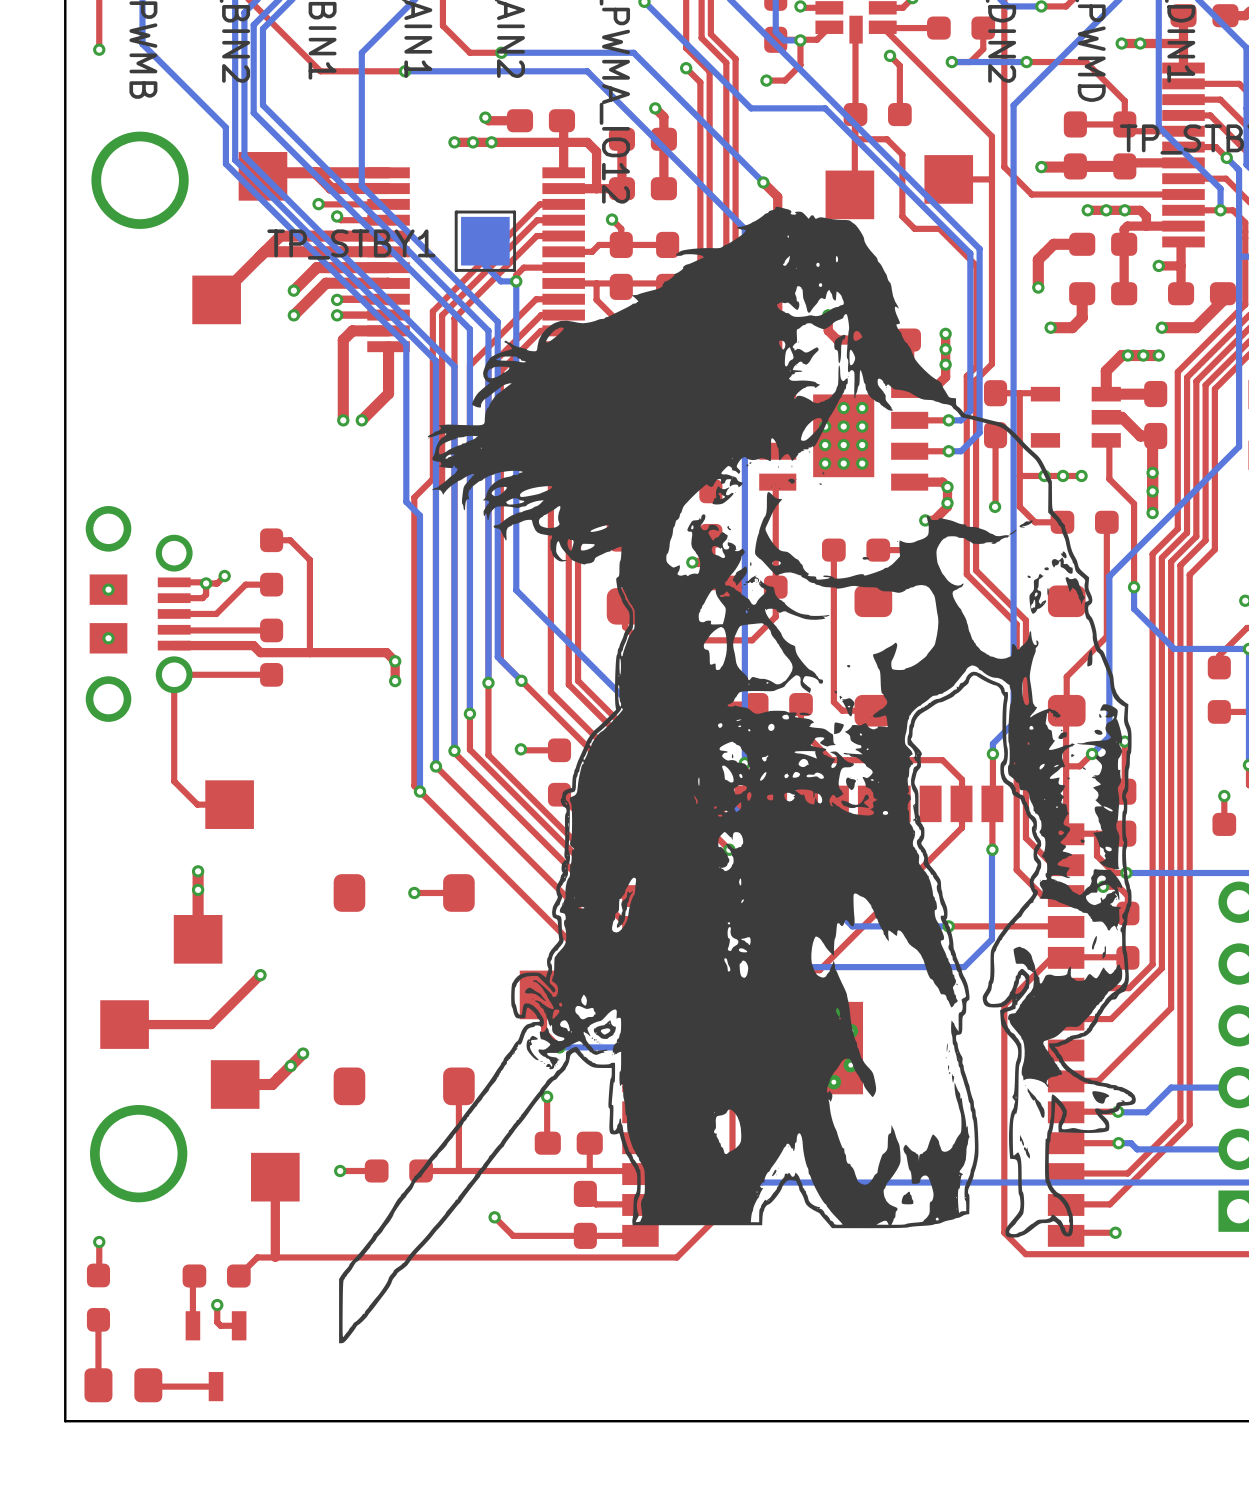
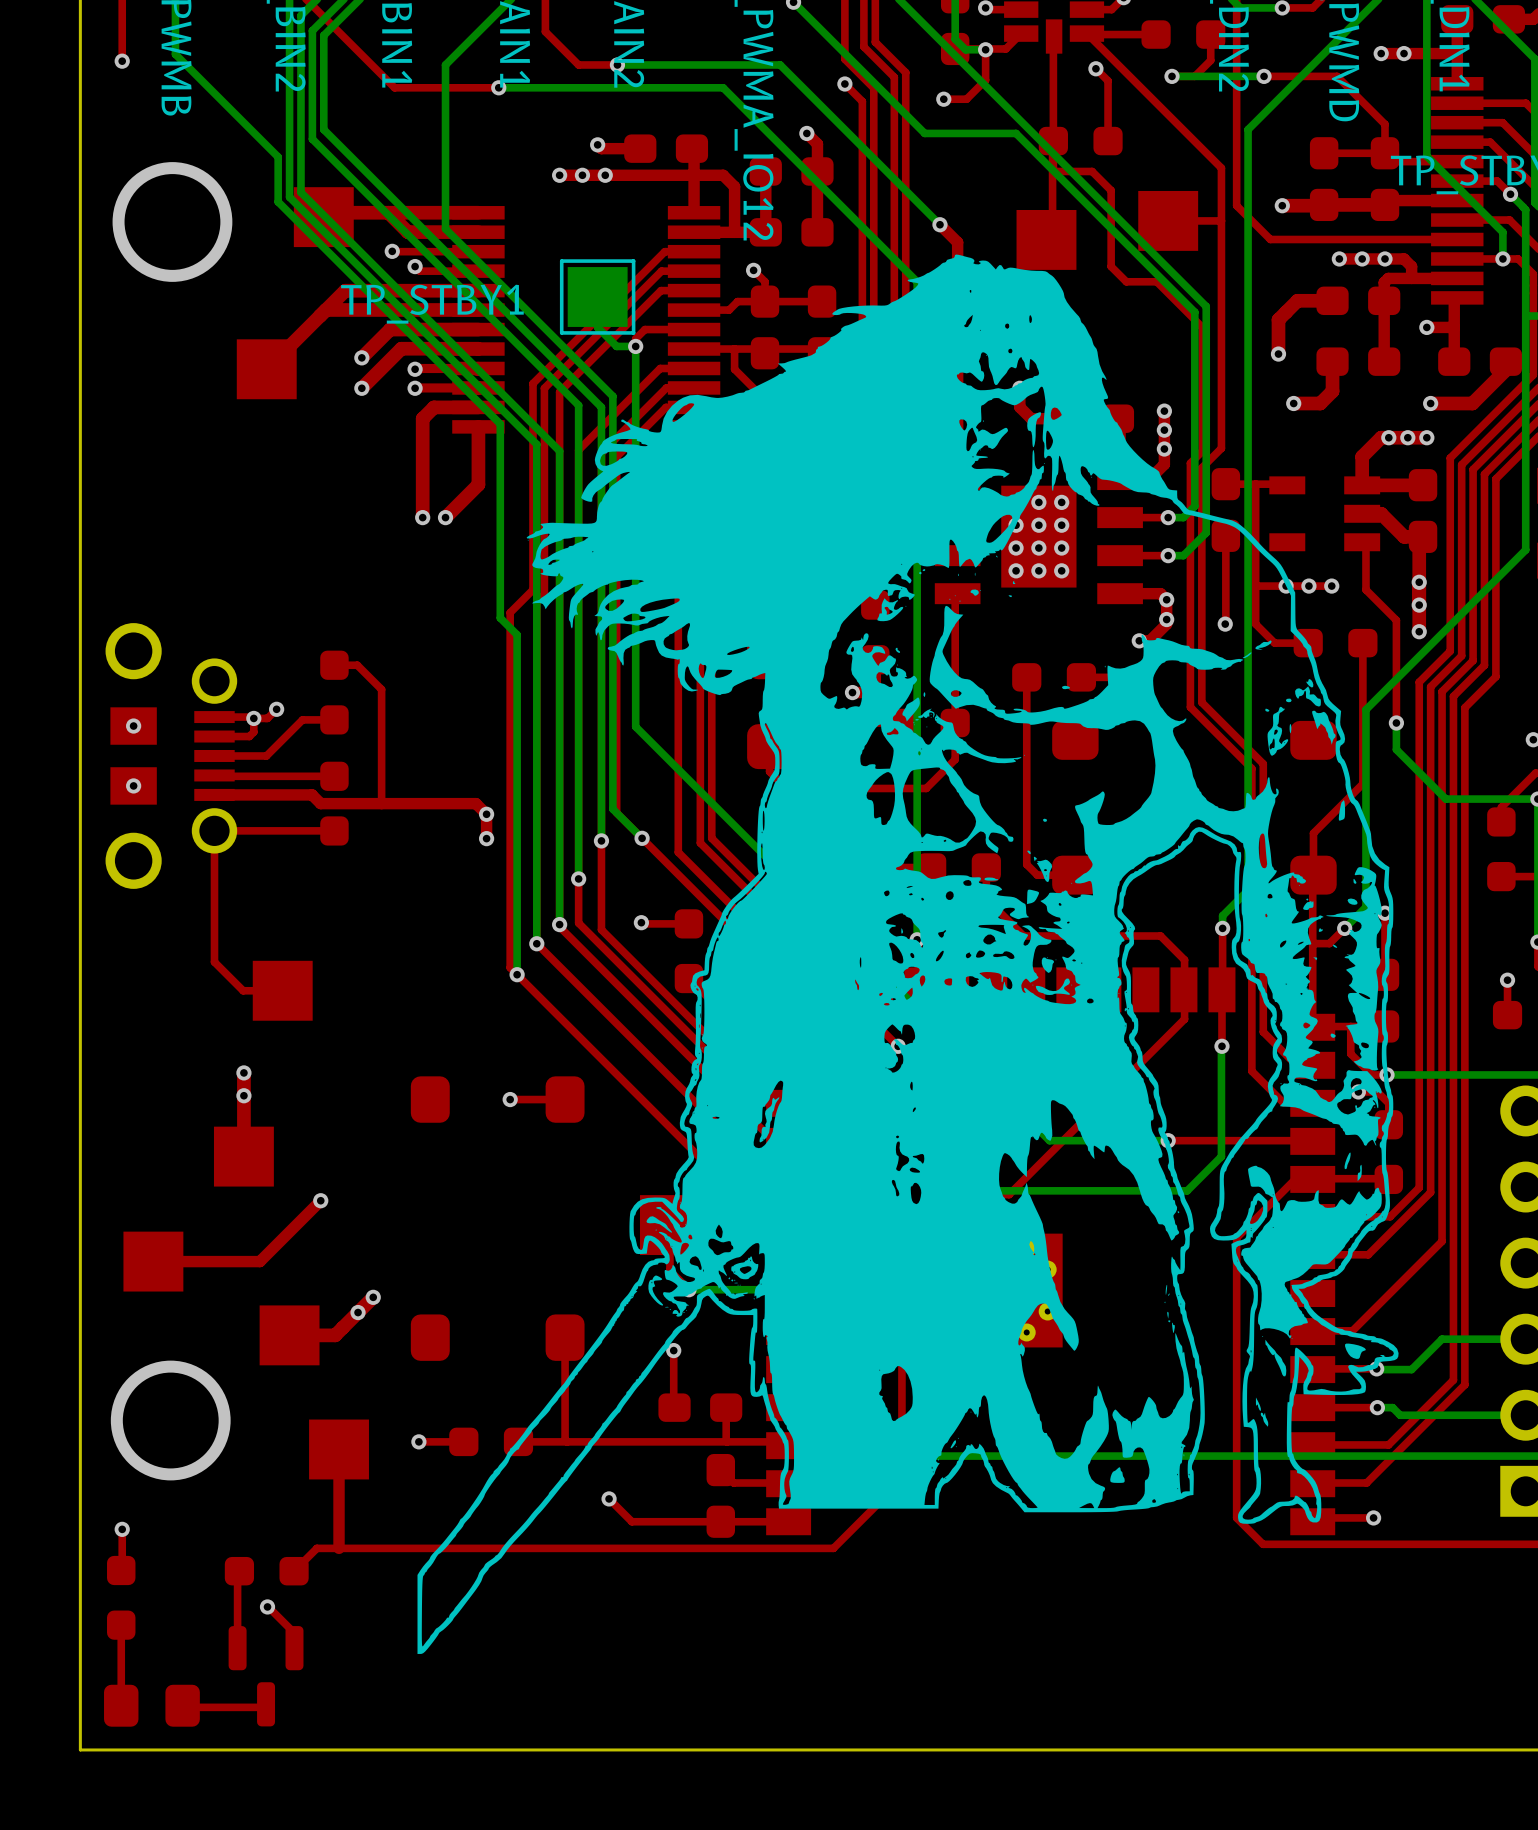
top track: (217, 1305) (217, 1322) (220, 1325) (239, 1325) -> none
top track: none -> (270, 1609) (294, 1633) (294, 1648)
part footprint: [185, 1311, 247, 1402] -> [228, 1626, 304, 1727]

